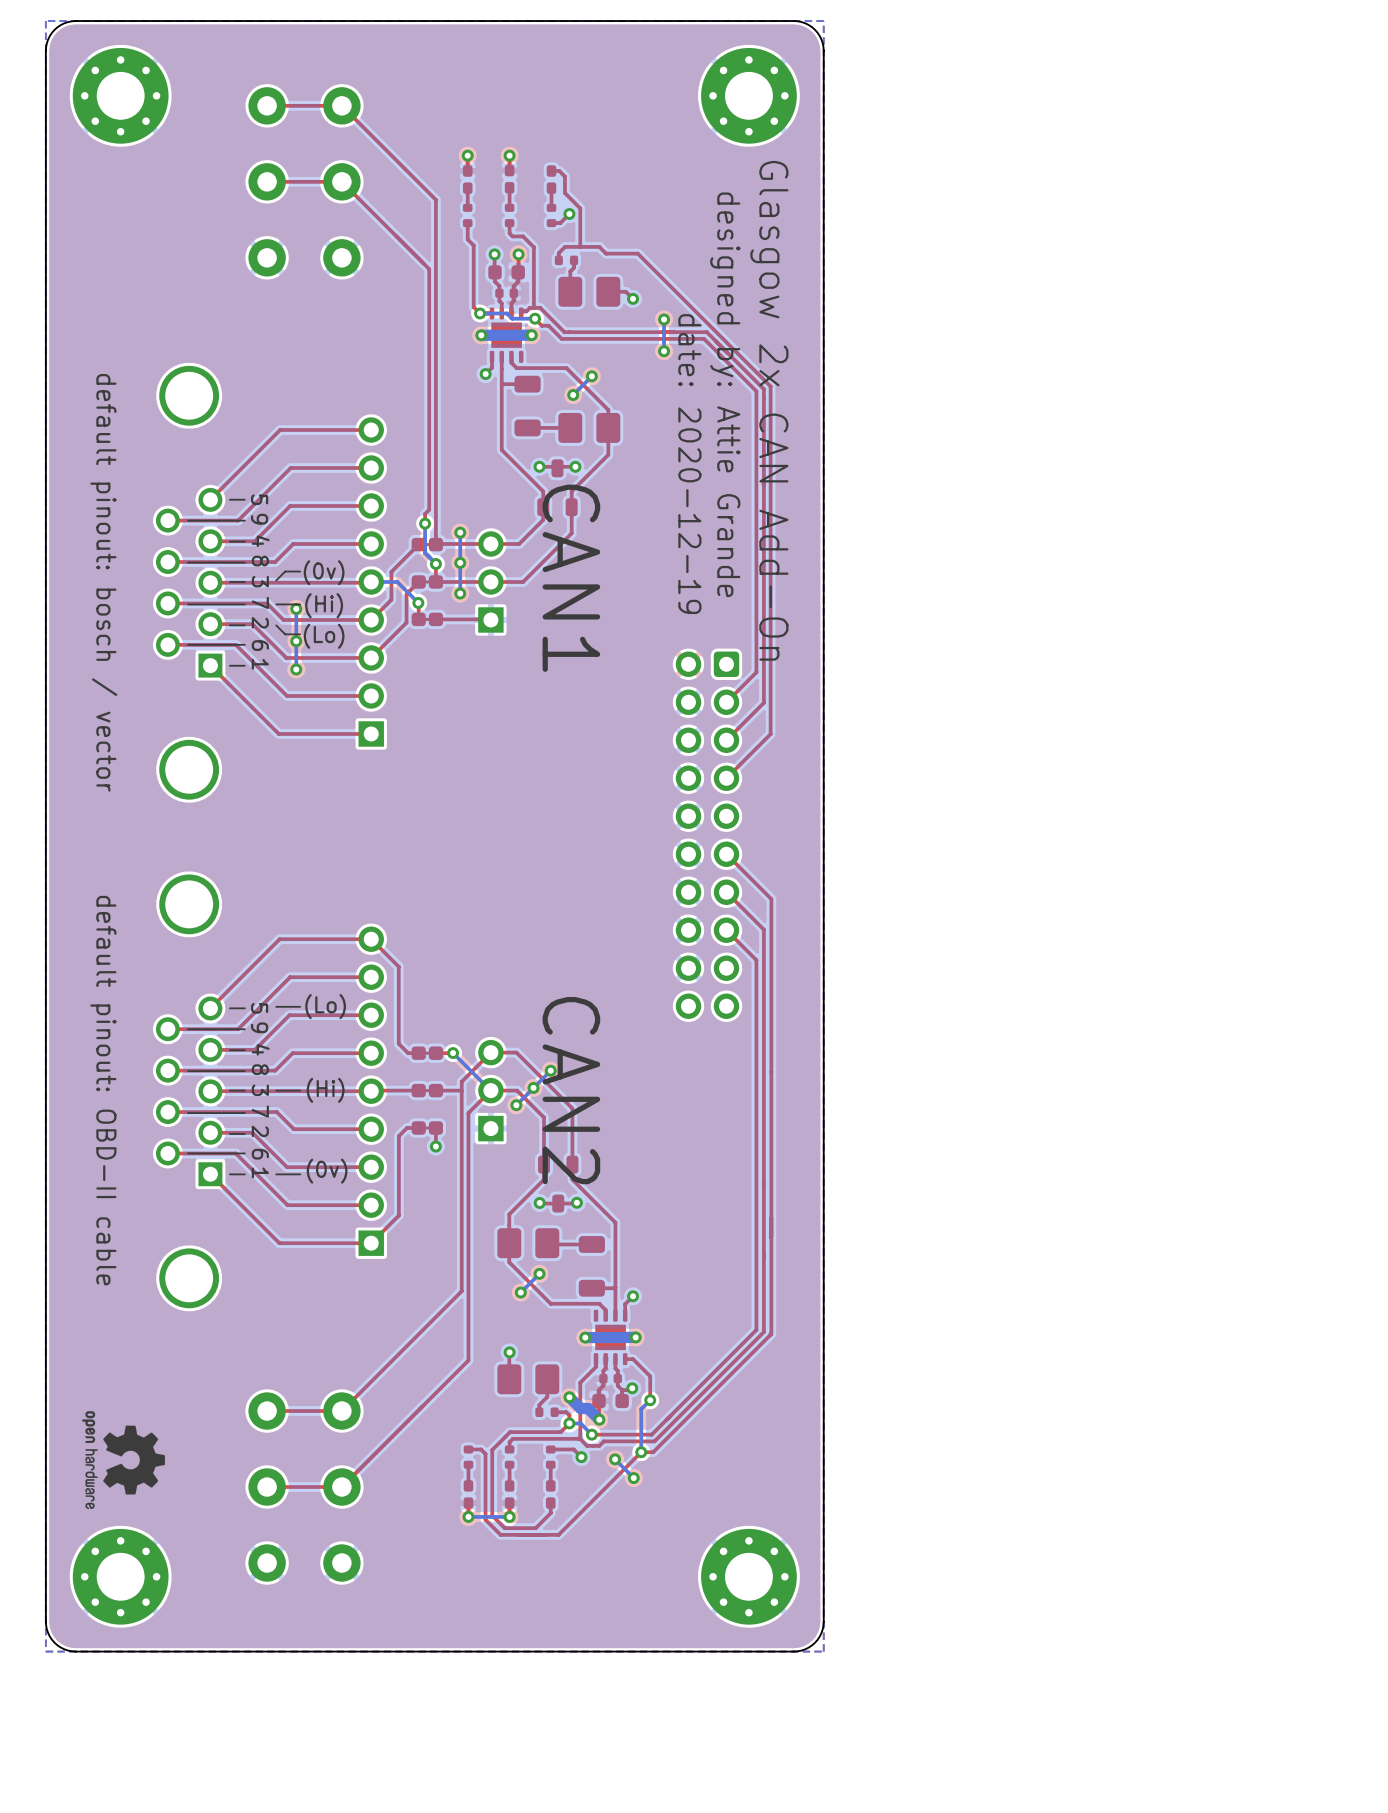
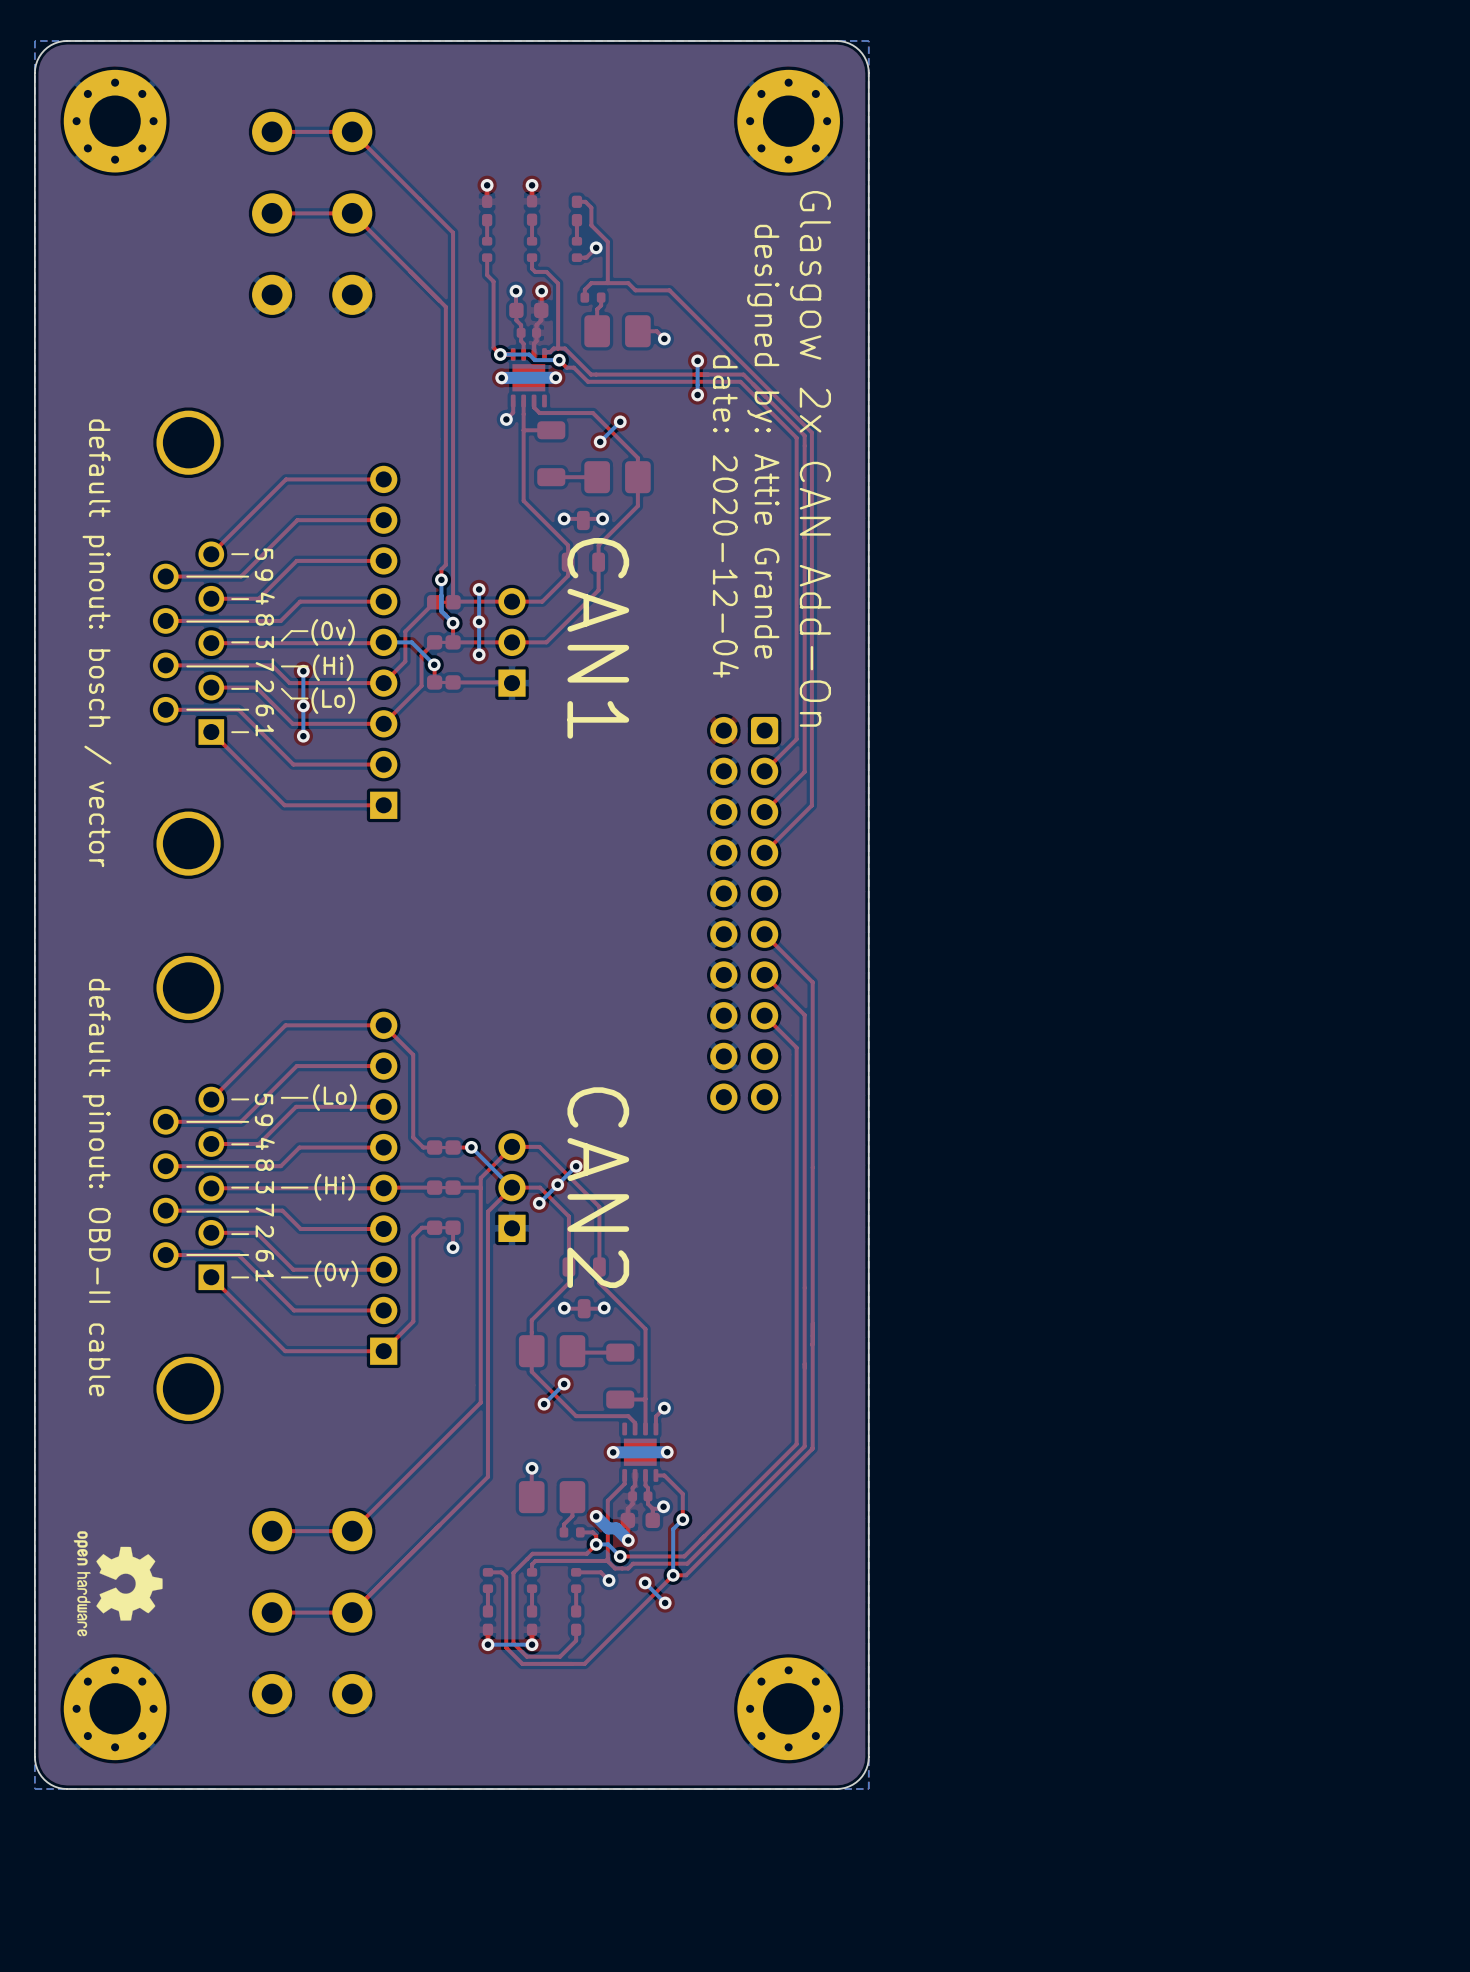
text: 2020-12-19 (689, 510) -> 2020-12-04 (725, 566)

